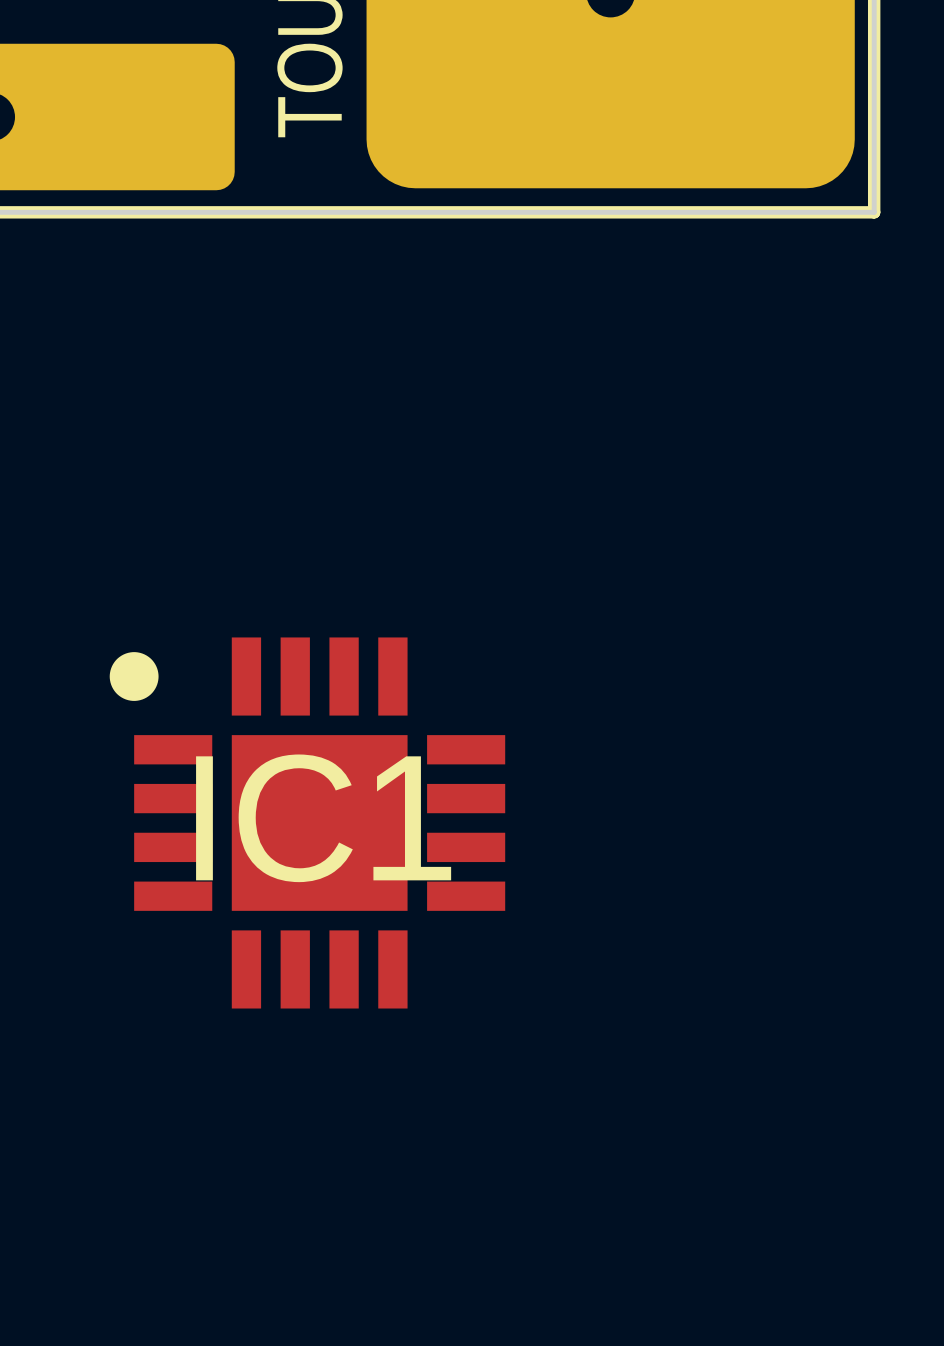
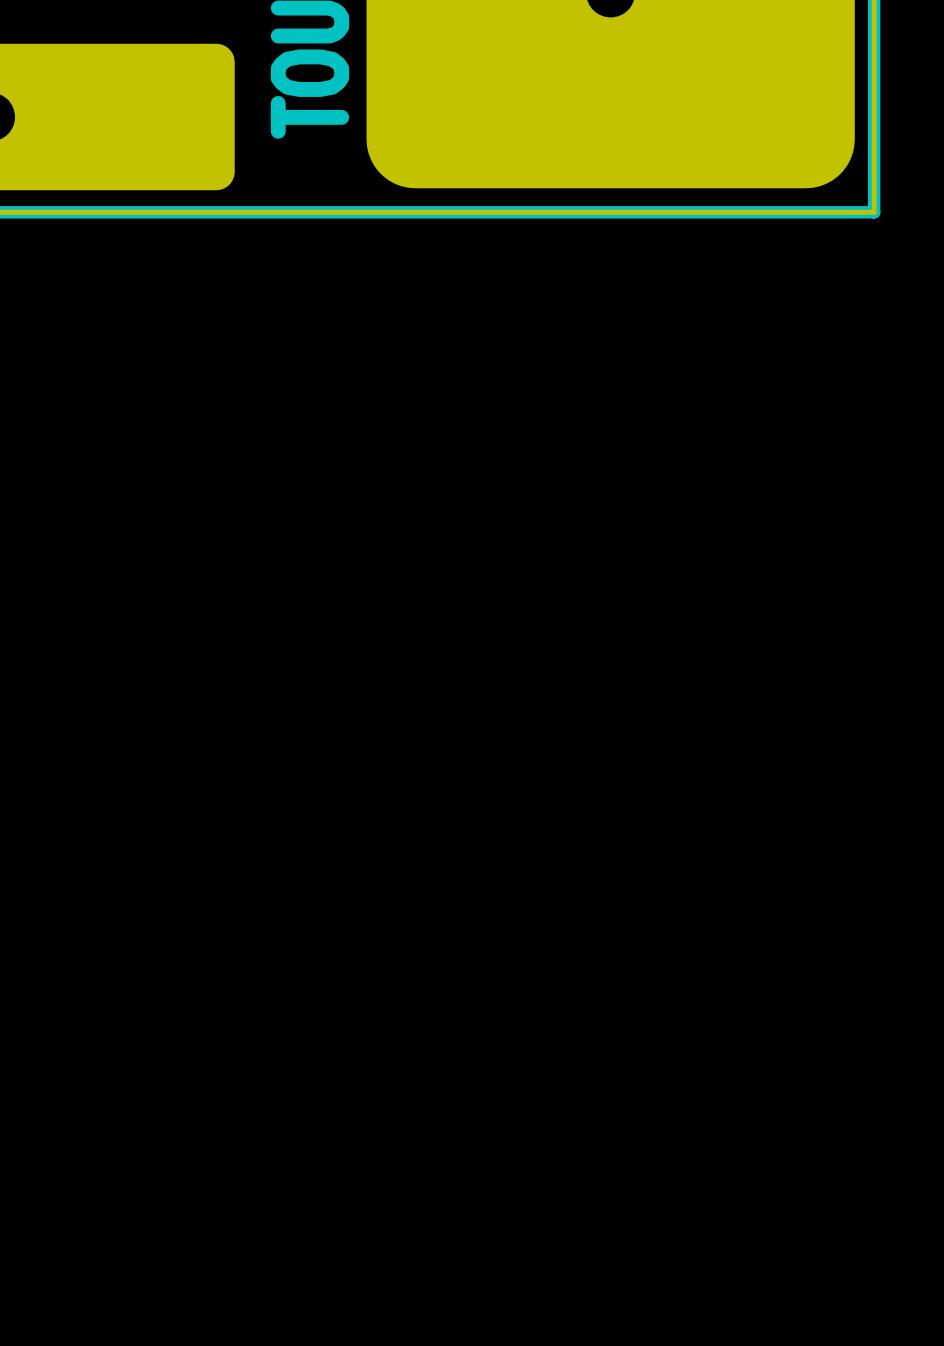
IC1: (307, 822) -> none

